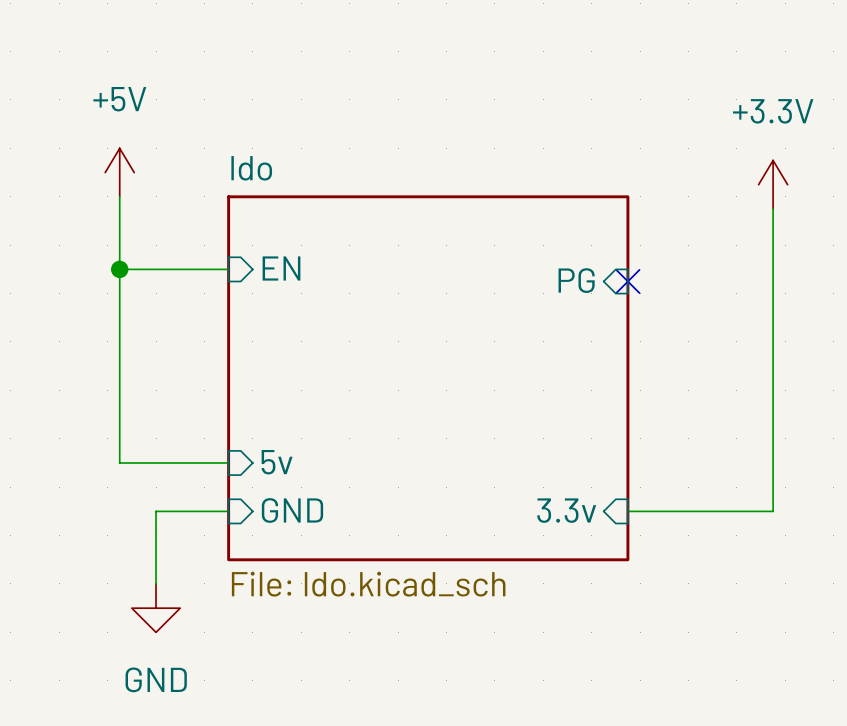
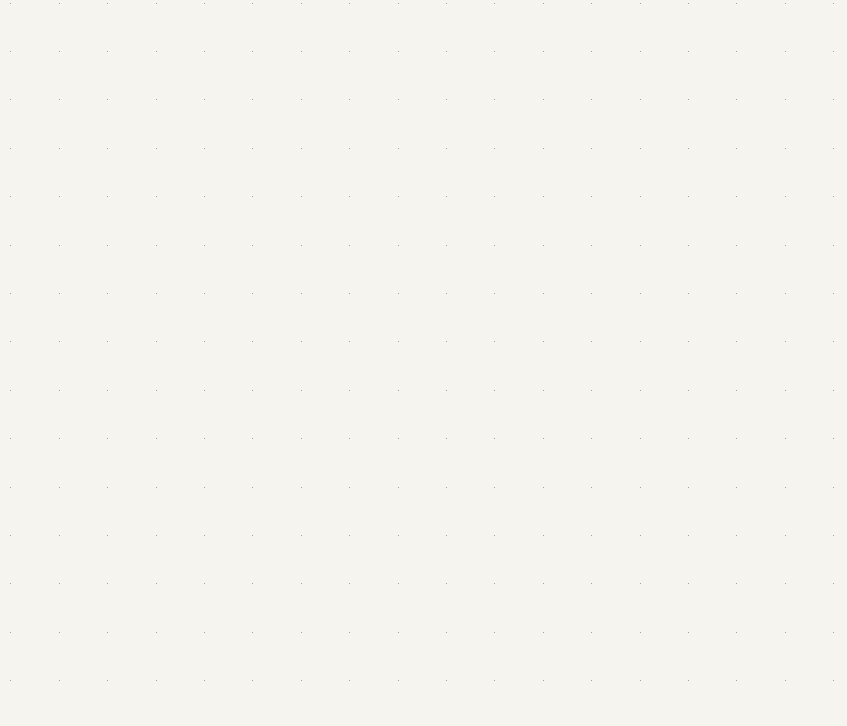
power symbol: +5V (119, 172) -> none
power symbol: +3.3V (773, 184) -> none
wire: (119, 196) (119, 462) (228, 462) -> none
wire: (773, 208) (773, 511) (627, 511) -> none
sheet pin: EN (281, 268) -> none
wire: (119, 269) (228, 269) -> none
junction: (119, 269) -> none
sheet pin: PG (576, 280) -> none
no-connect mark: (627, 281) -> none
sheet ldo: File: ldo.kicad_sch (428, 378) -> none
sheet pin: 5v (277, 462) -> none
sheet pin: GND (292, 510) -> none
sheet pin: 3.3v (566, 510) -> none
wire: (228, 511) (156, 511) (156, 583) -> none
power symbol: GND (156, 608) -> none

